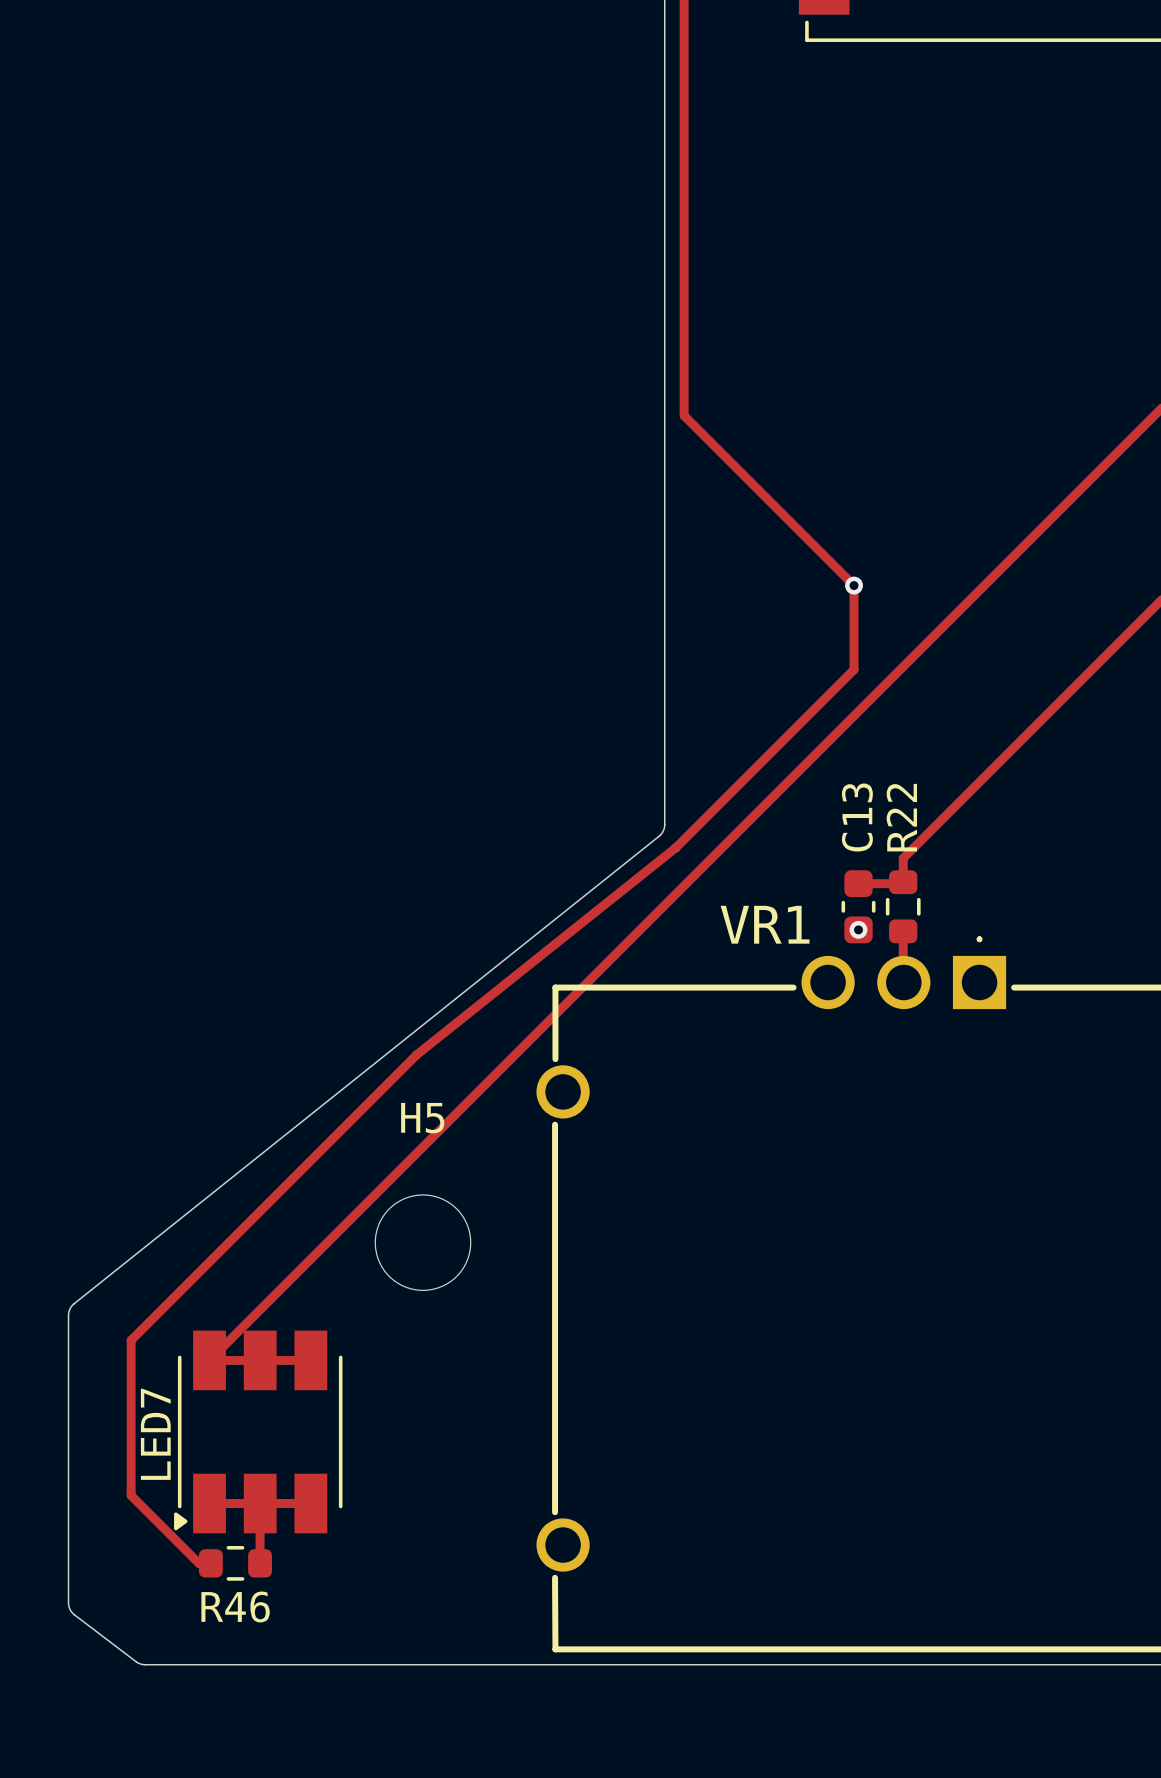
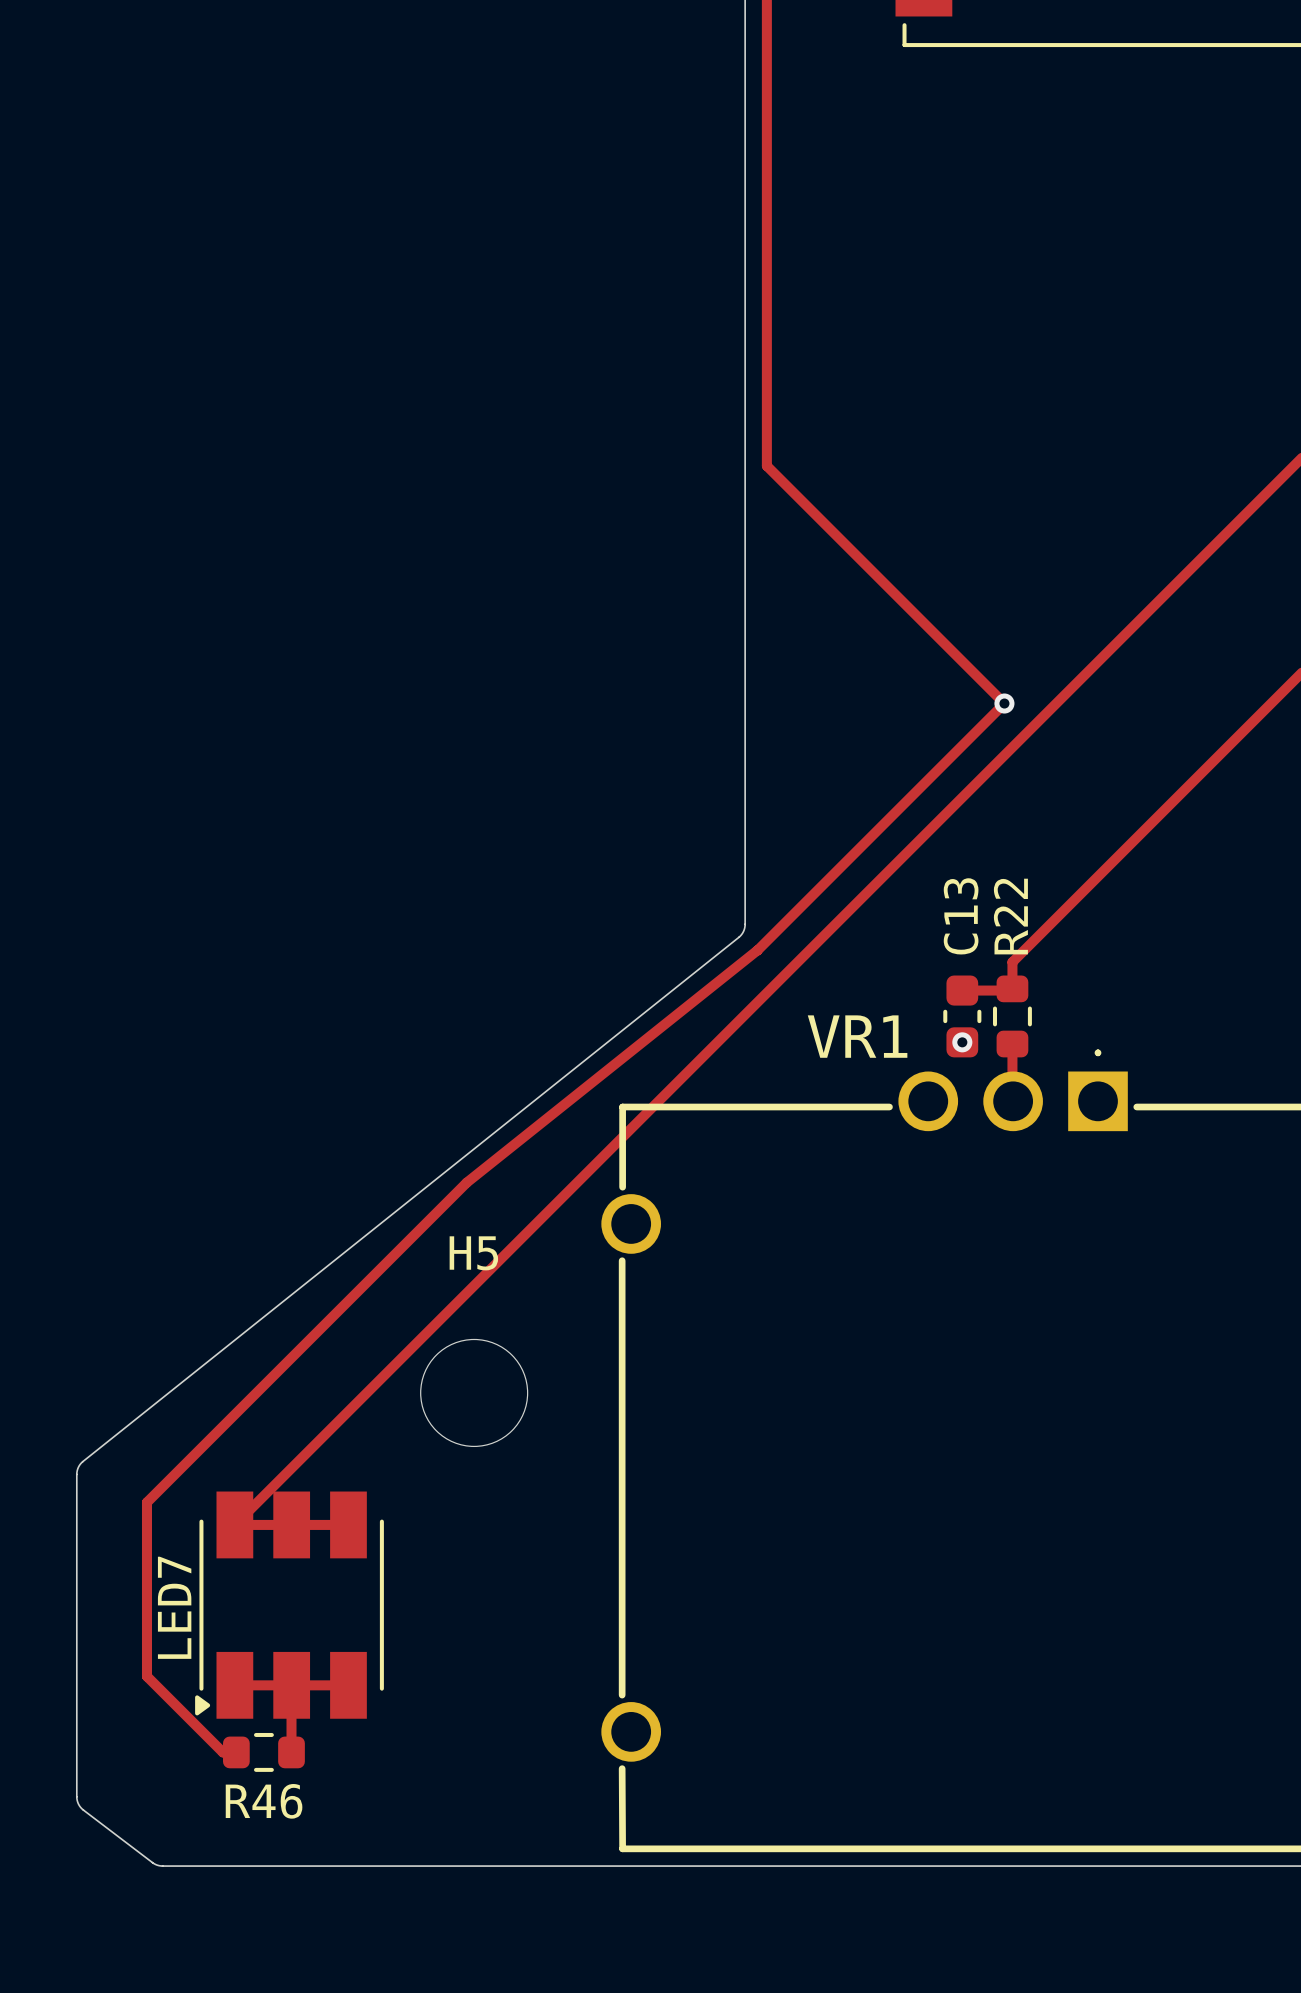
track: (854, 585) (854, 669) -> (957, 656) (1004, 703) (957, 750)
via position: (854, 585) -> (1004, 703)

